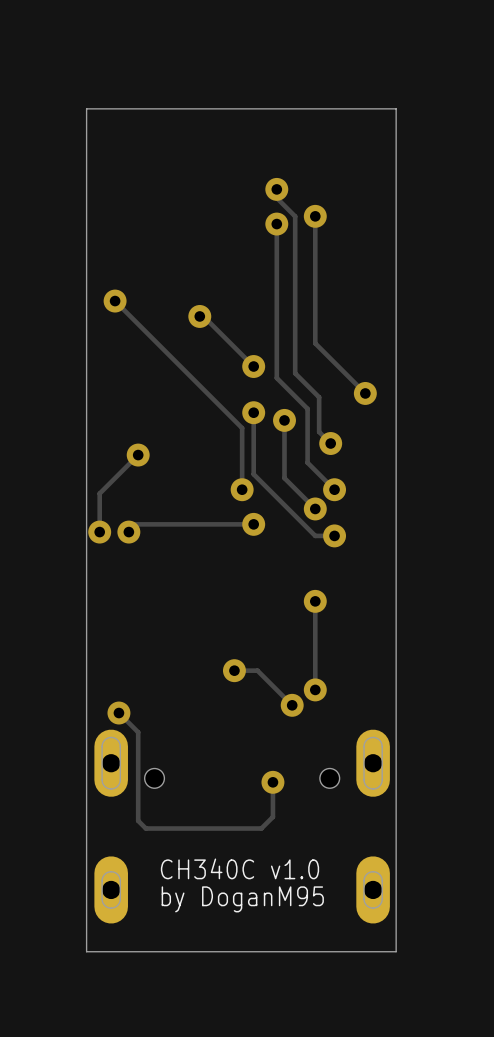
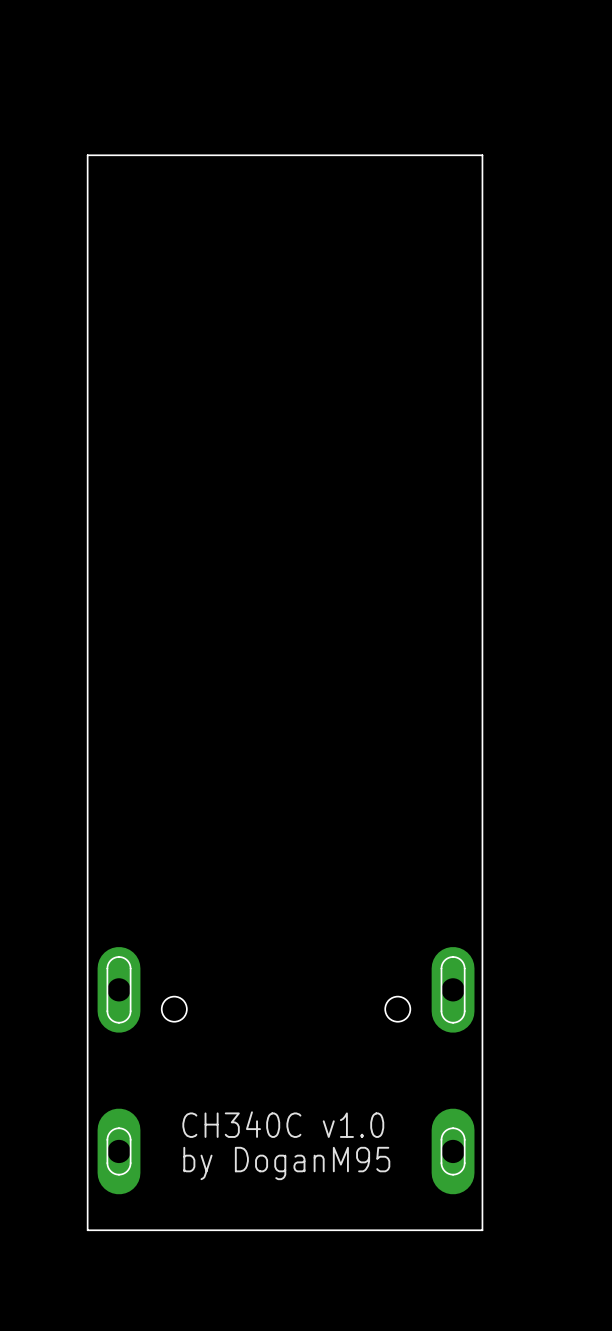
track: (276, 189) (276, 198) (295, 216) (295, 373) (319, 397) (319, 431) (330, 443) -> none
via: (276, 189) -> none
track: (315, 216) (315, 343) (365, 393) -> none
via: (315, 216) -> none
track: (276, 224) (276, 378) (307, 408) (307, 462) (334, 489) -> none
via: (276, 224) -> none
track: (115, 301) (242, 428) (242, 489) -> none
via: (115, 301) -> none
track: (199, 316) (203, 316) (253, 366) -> none
via: (199, 316) -> none
via: (253, 366) -> none
via: (365, 393) -> none
track: (253, 412) (253, 474) (315, 535) (334, 535) -> none
via: (253, 412) -> none
track: (284, 420) (284, 478) (315, 508) -> none
via: (284, 420) -> none
via: (330, 443) -> none
track: (138, 455) (99, 493) (99, 532) -> none
via: (138, 455) -> none
via: (242, 489) -> none
via: (334, 489) -> none
via: (315, 508) -> none
track: (253, 524) (134, 524) (126, 532) (128, 532) -> none
via: (253, 524) -> none
via: (99, 532) -> none
via: (128, 532) -> none
via: (334, 535) -> none
track: (315, 601) (315, 689) -> none
via: (315, 601) -> none
track: (234, 670) (257, 670) (292, 705) -> none
via: (234, 670) -> none
via: (315, 689) -> none
via: (292, 705) -> none
track: (118, 713) (138, 732) (138, 820) (145, 828) (261, 828) (272, 816) (272, 782) -> none
via: (118, 713) -> none
via: (272, 782) -> none

